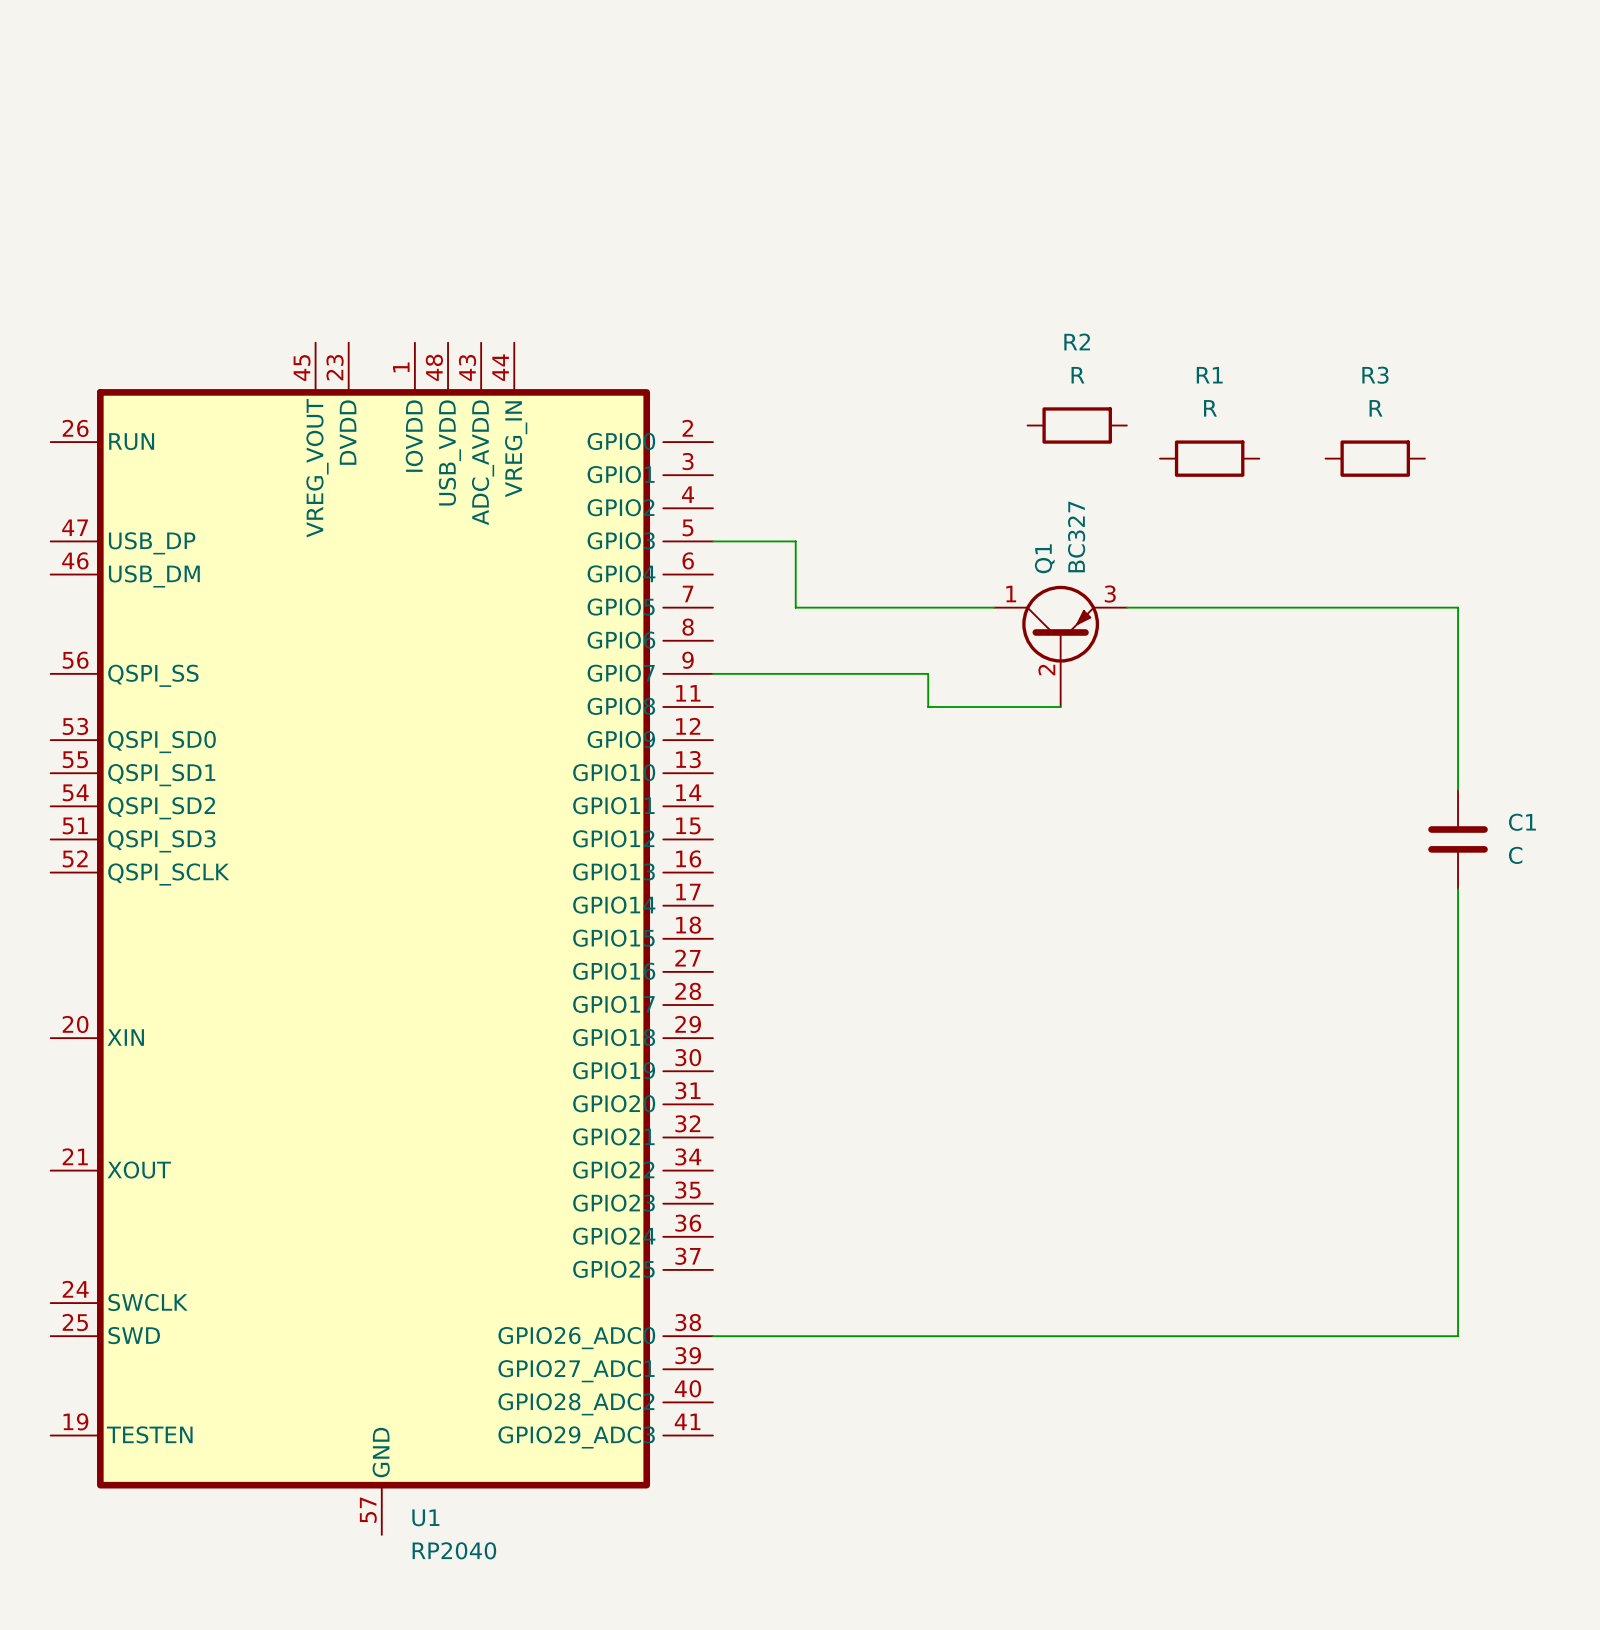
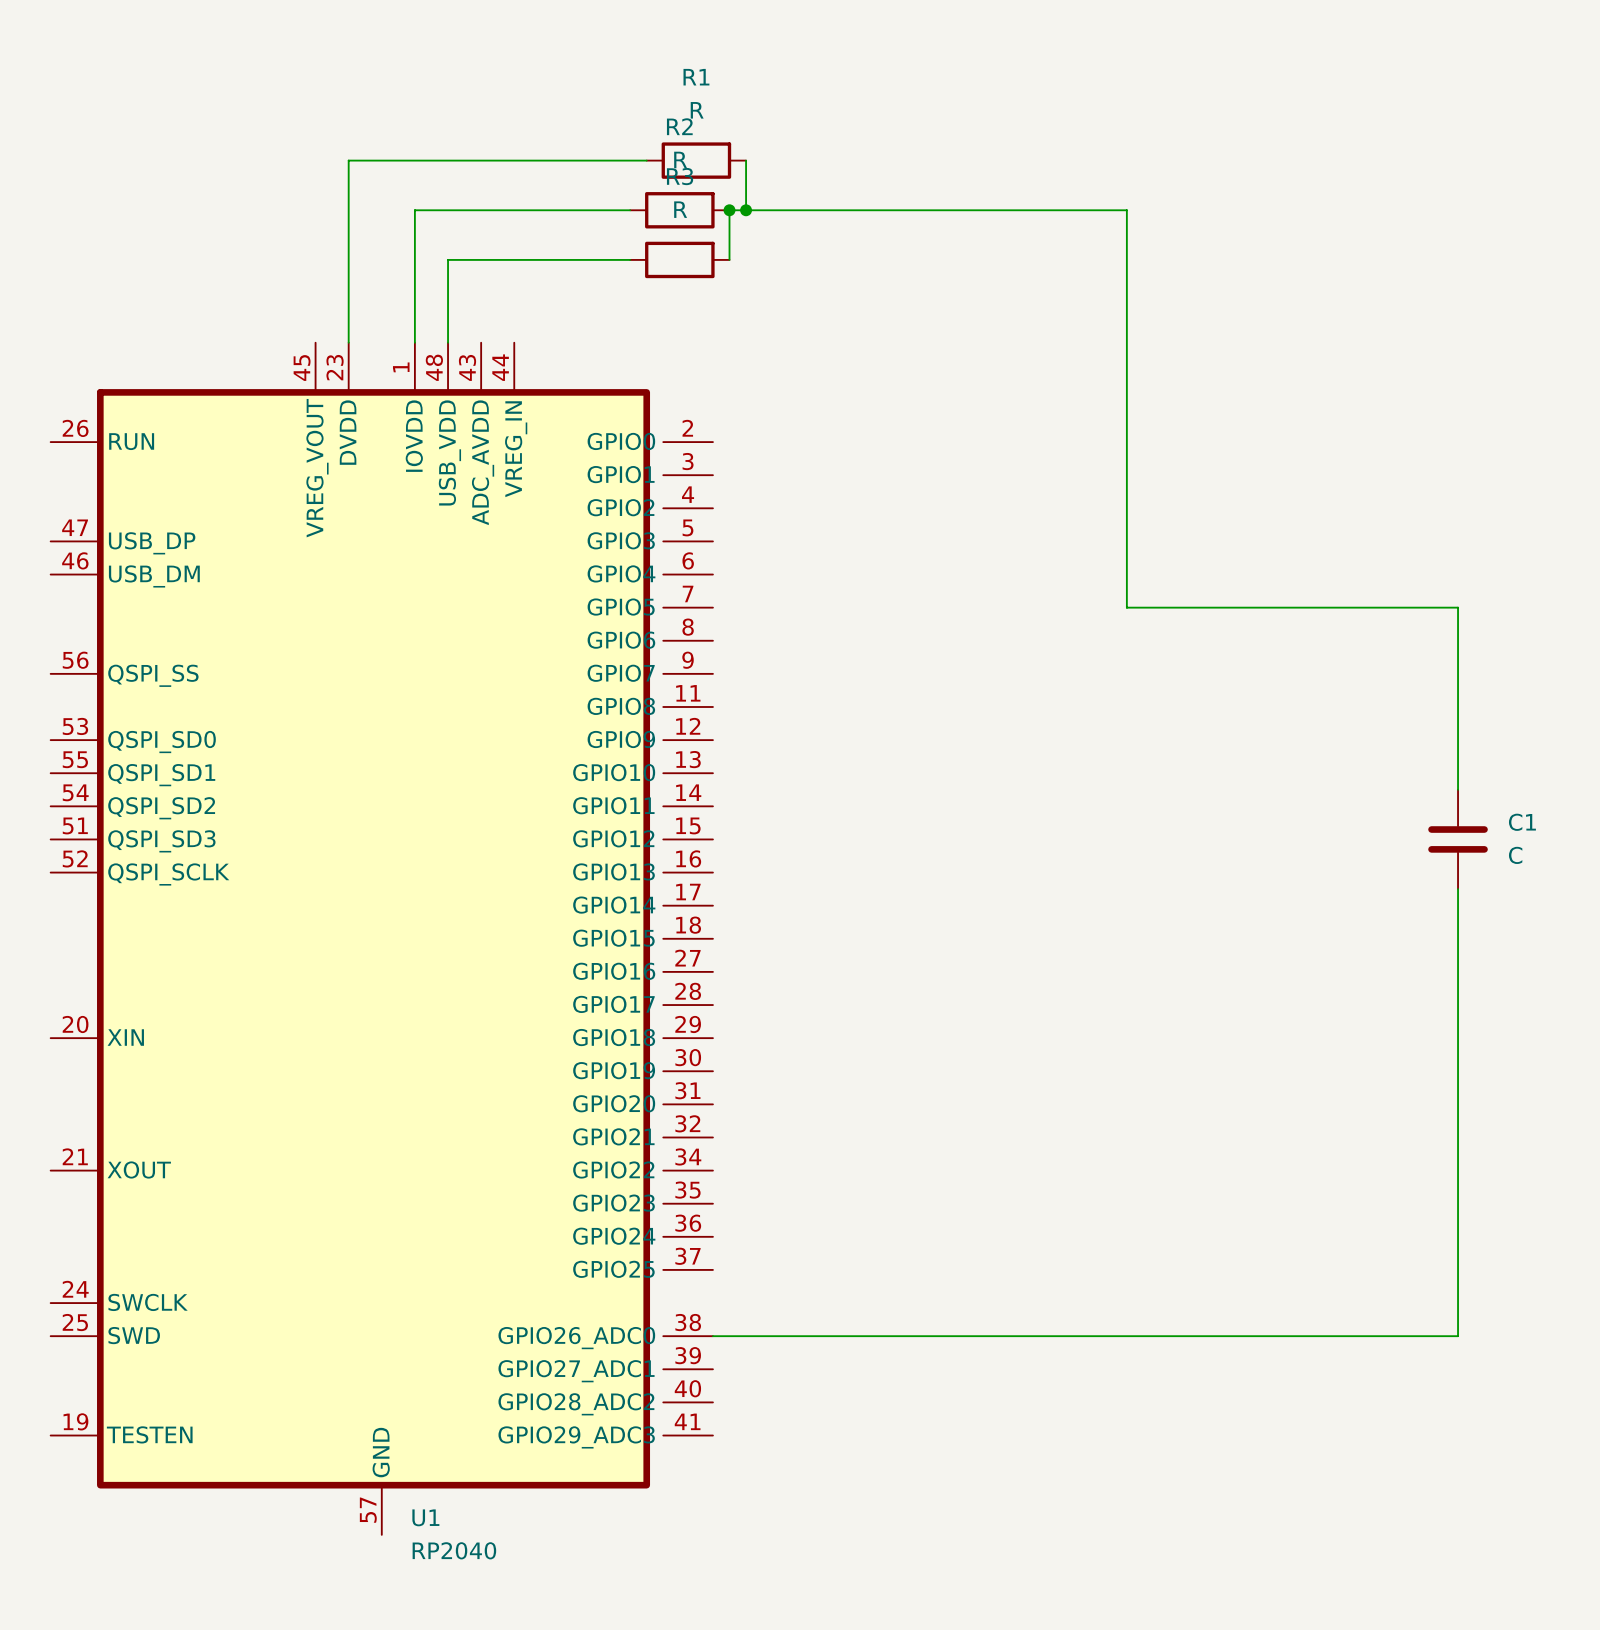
wire: none -> (646, 160) (348, 160) (348, 342)
wire: none -> (746, 160) (746, 210)
wire: none -> (630, 210) (414, 210) (414, 342)
junction: none -> (729, 210)
junction: none -> (746, 210)
wire: none -> (630, 259) (448, 259) (448, 342)
wire: none -> (729, 259) (729, 210) (1126, 210) (1126, 607)
R2 position: (1077, 425) -> (679, 210)
R1 position: (1209, 458) -> (696, 160)
R3 position: (1375, 458) -> (679, 259)
wire: (712, 541) (795, 541) (795, 607) (994, 607) -> none
Q1: BC327 (1060, 646) -> none
wire: (712, 673) (928, 673) (928, 706) (1060, 706) -> none

